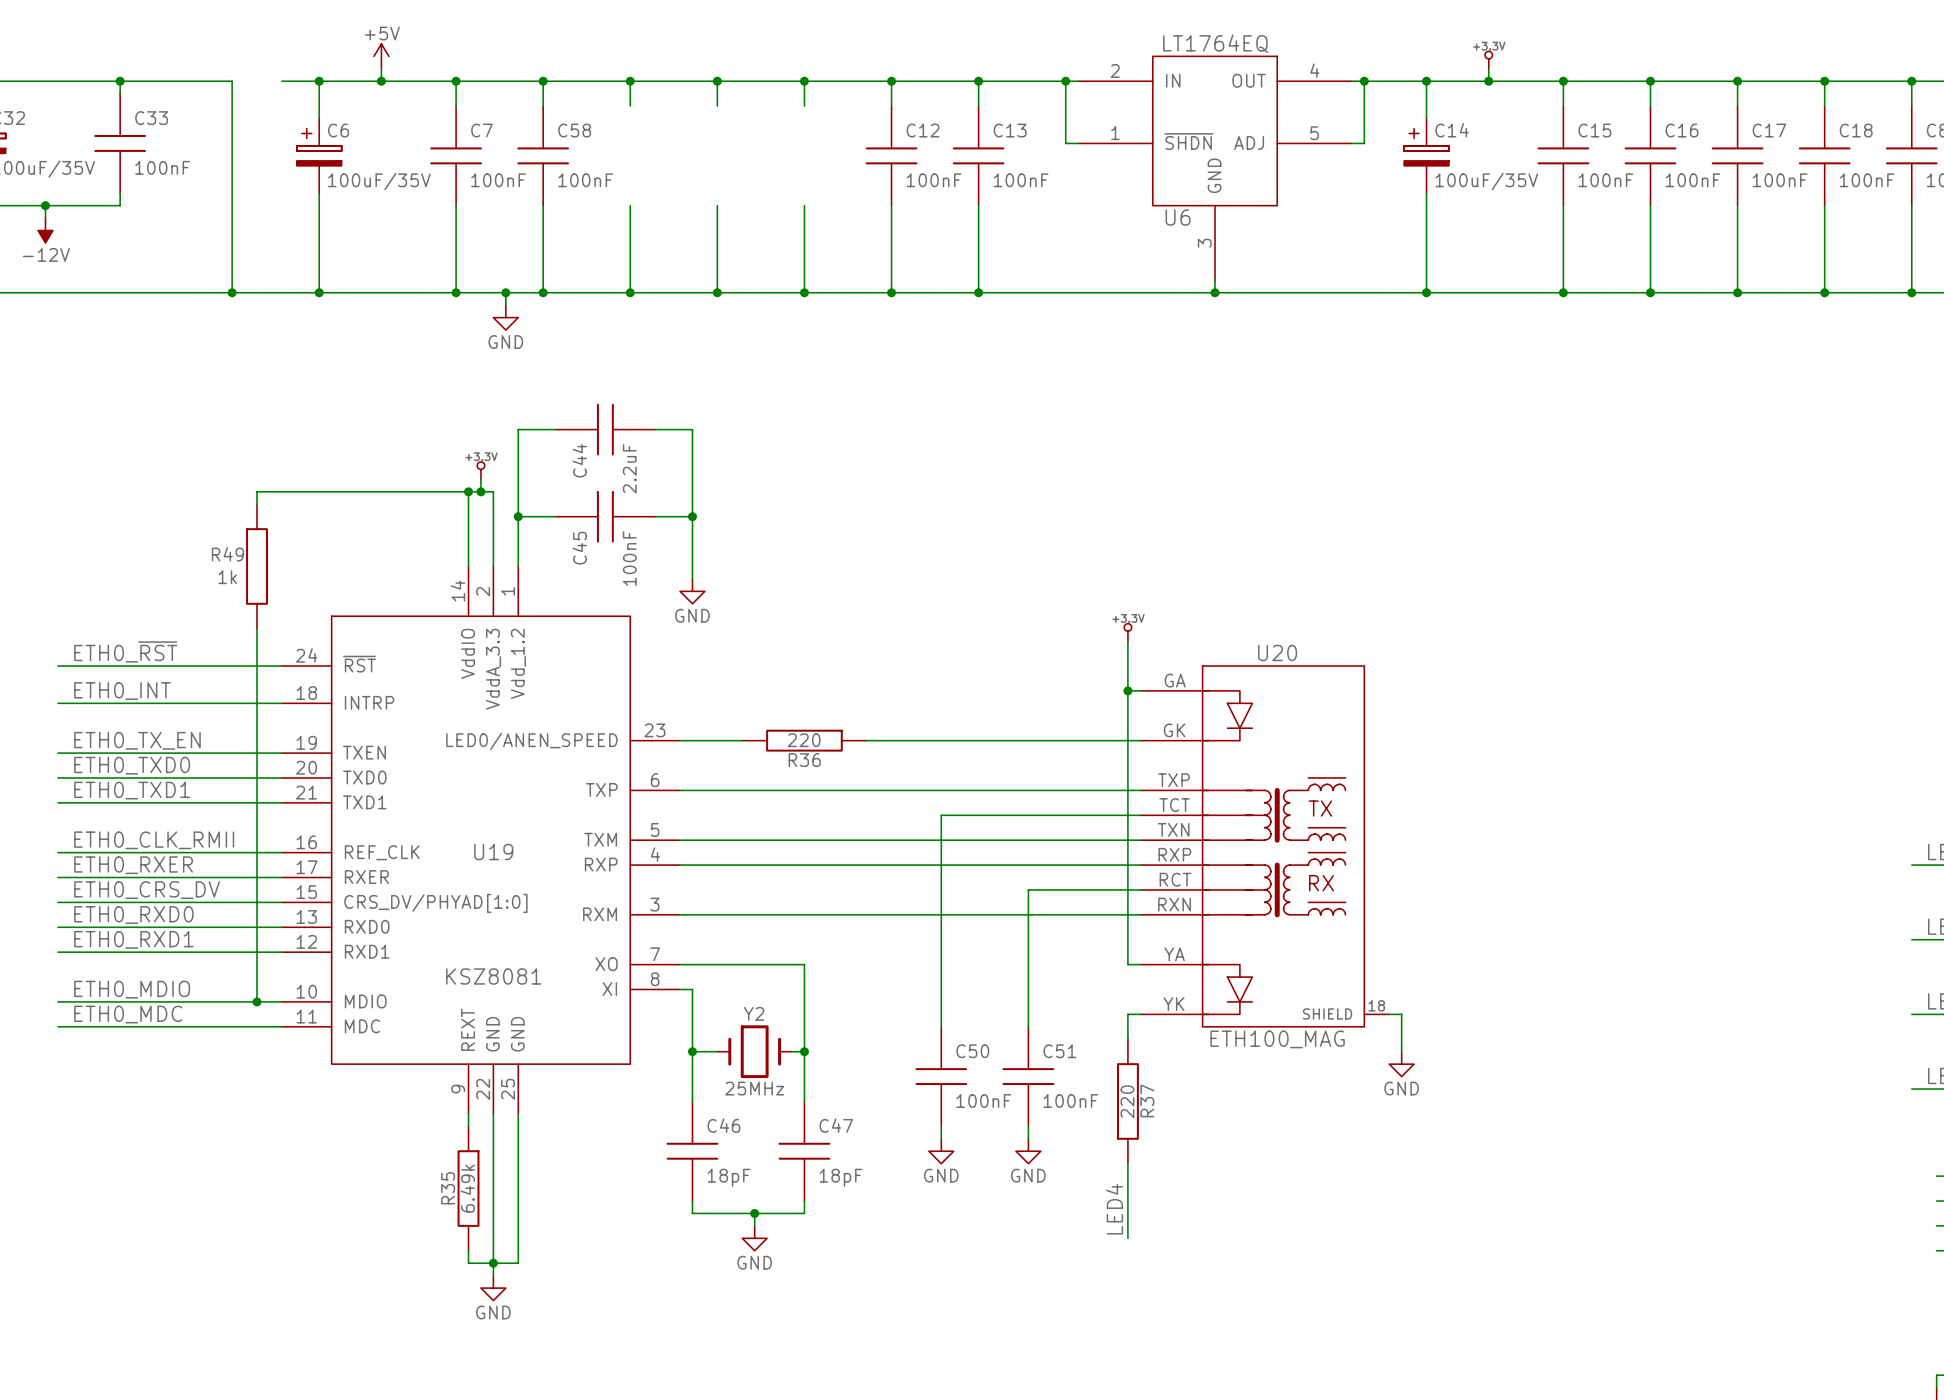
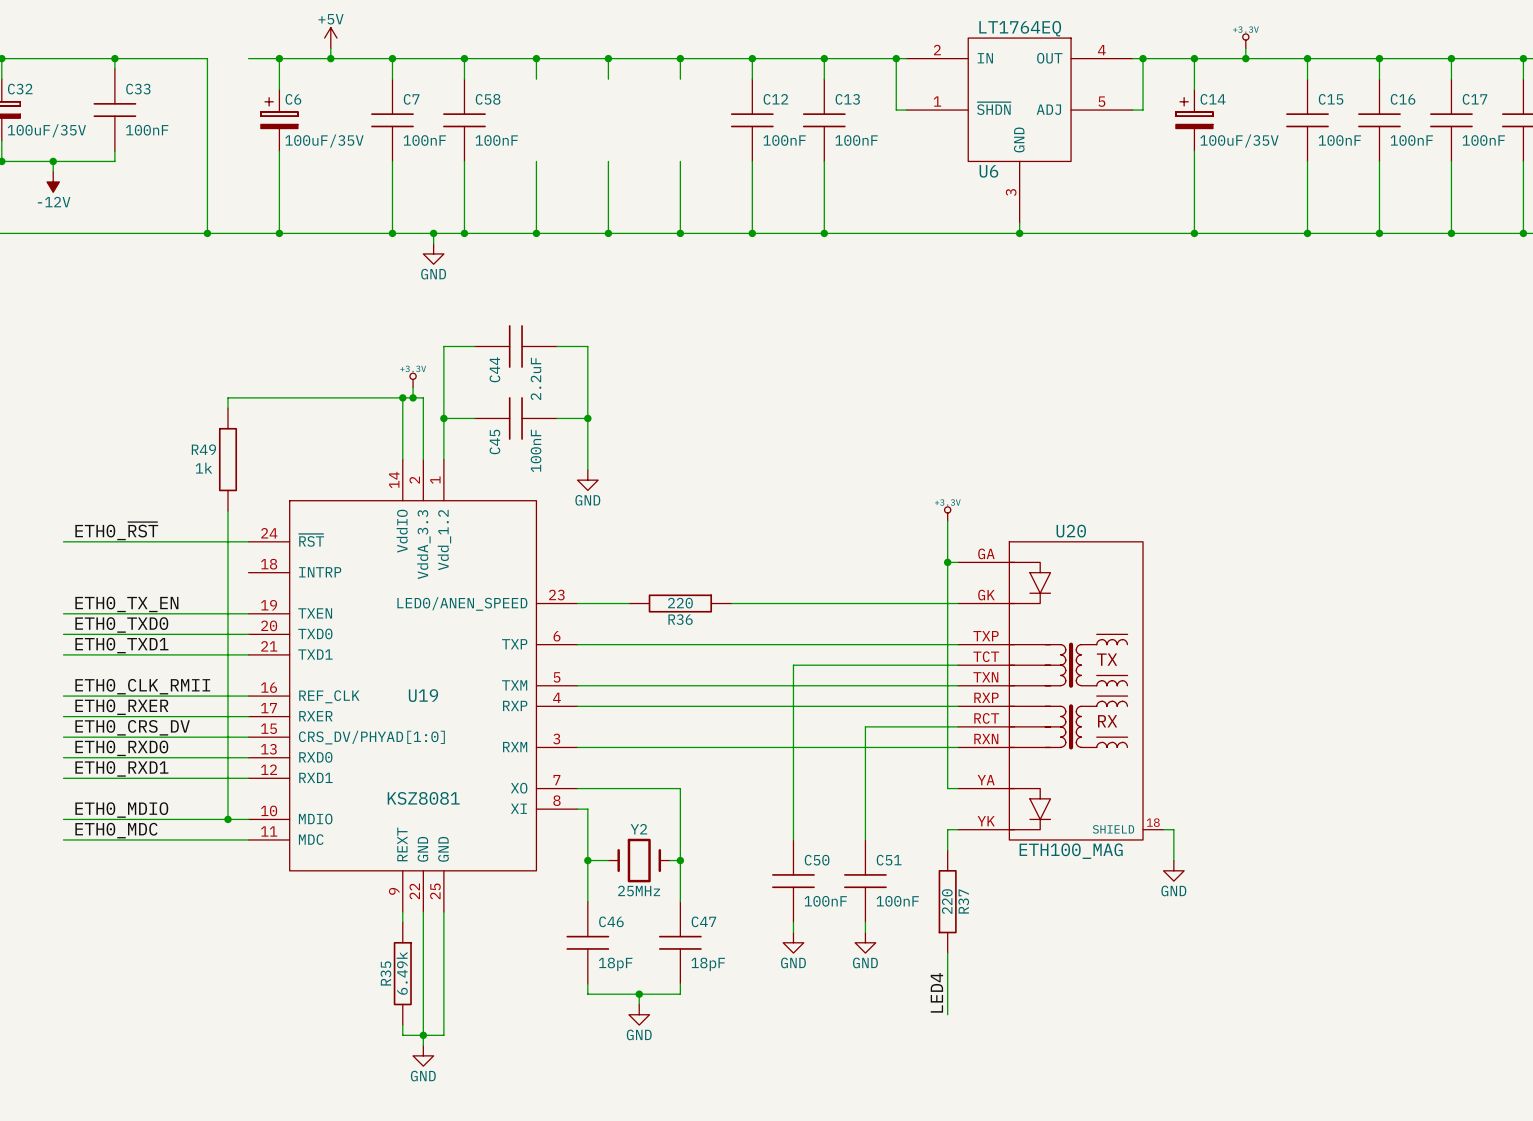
label: ETH0_INT (122, 691) -> none
wire: (57, 703) (281, 703) -> none

